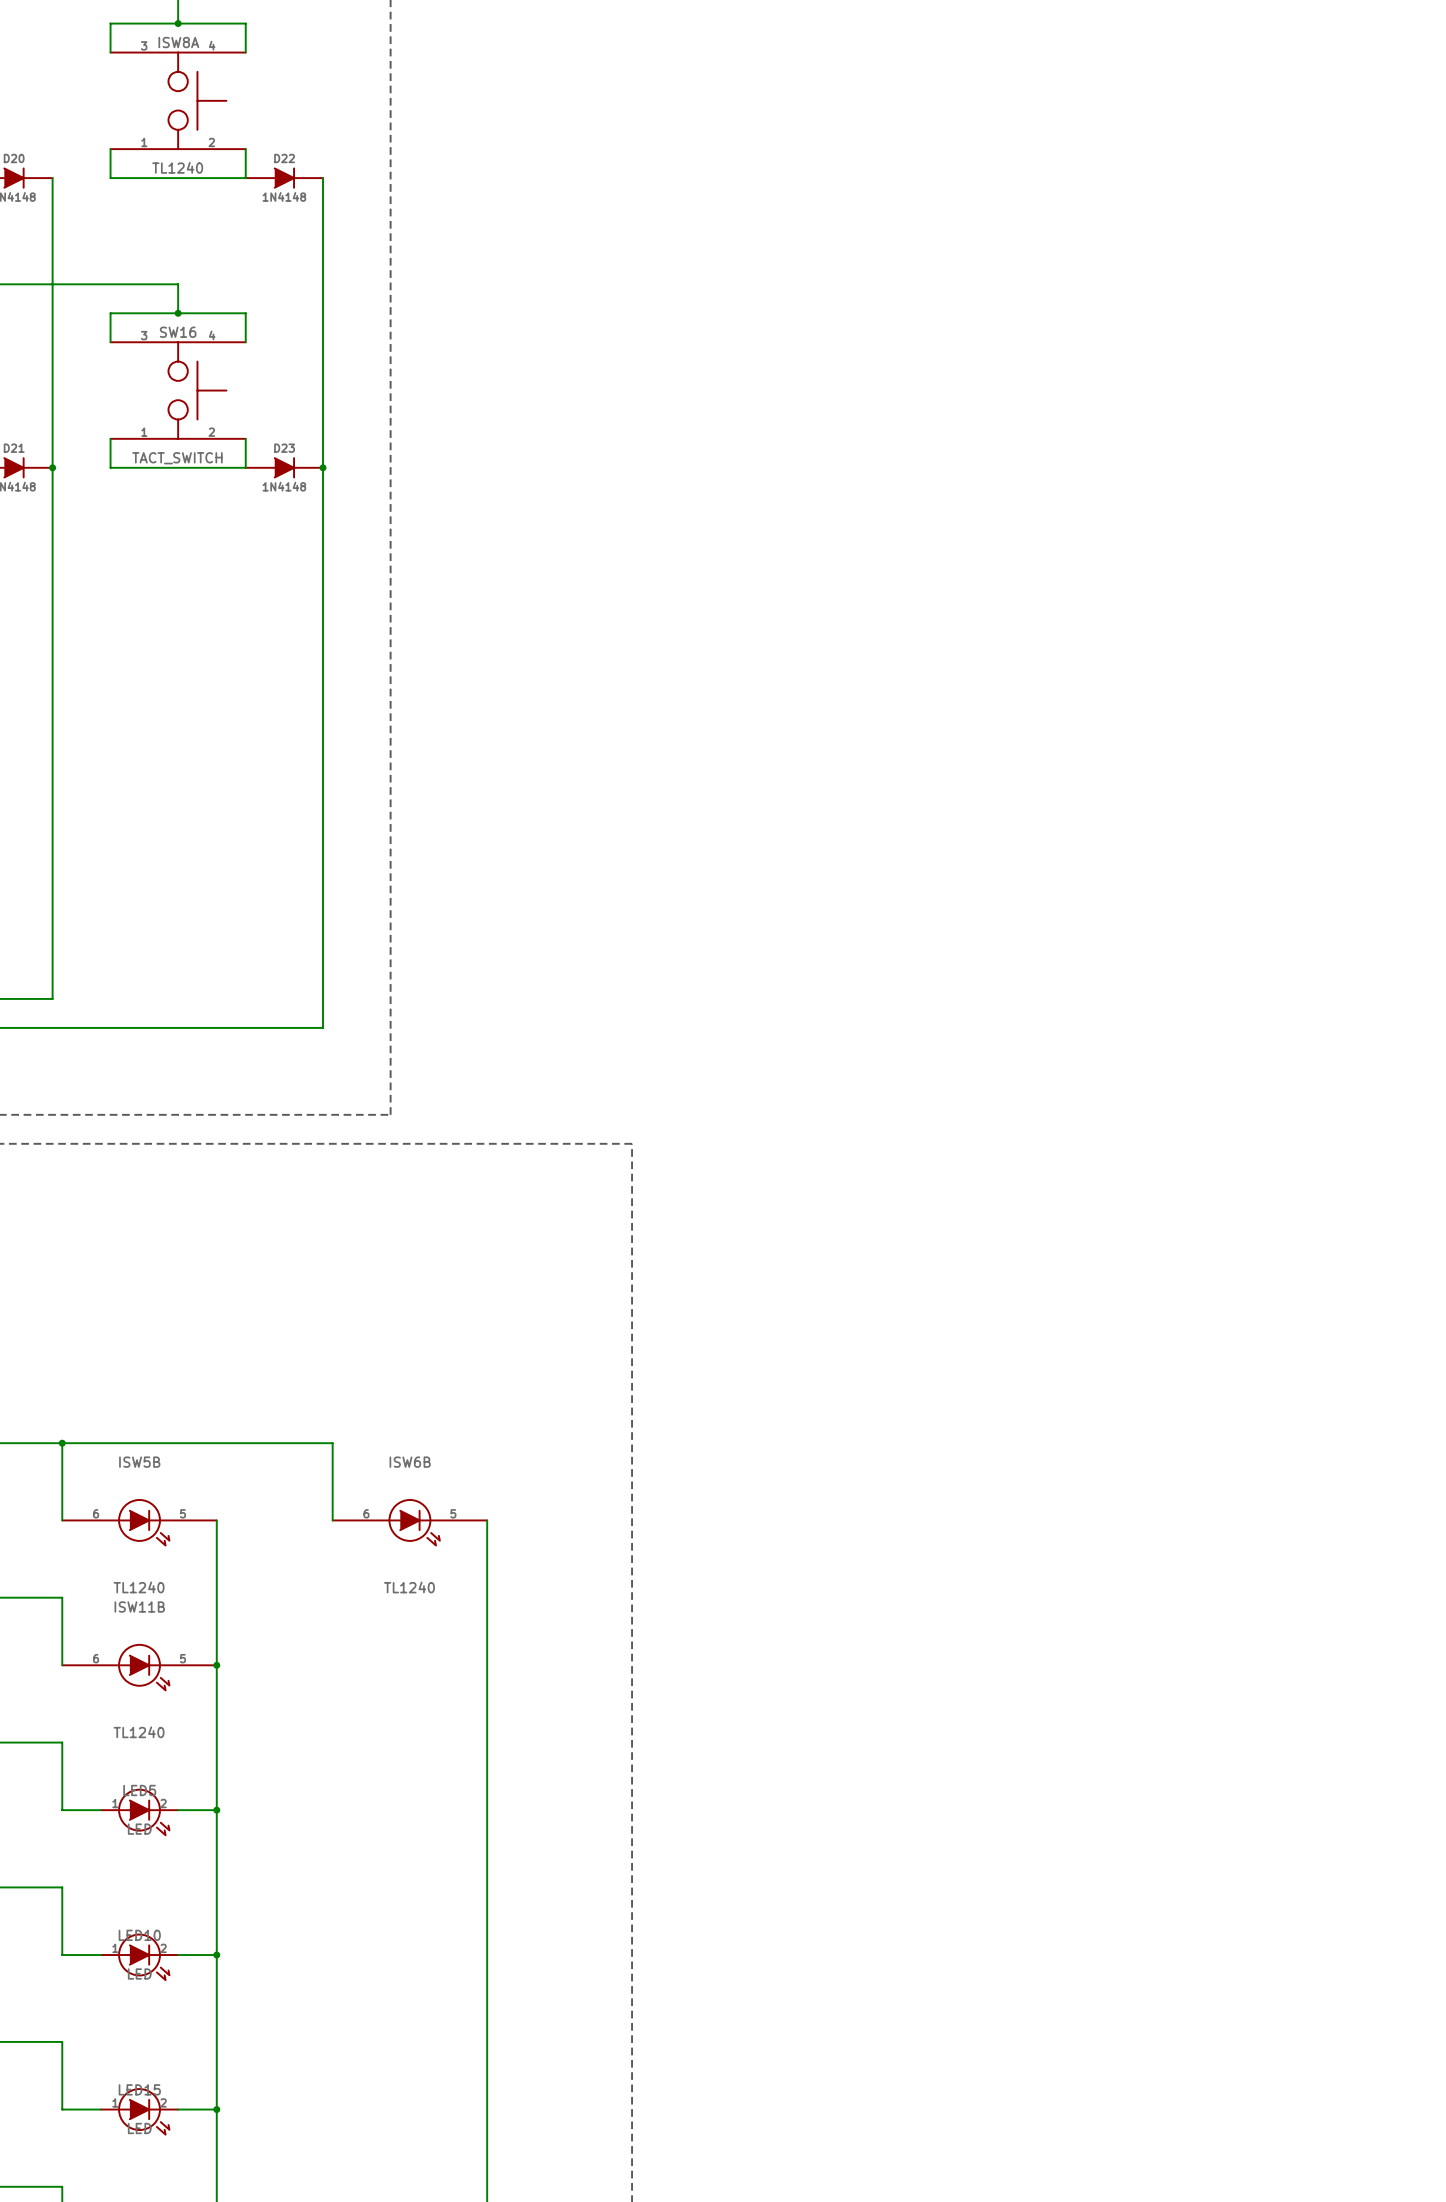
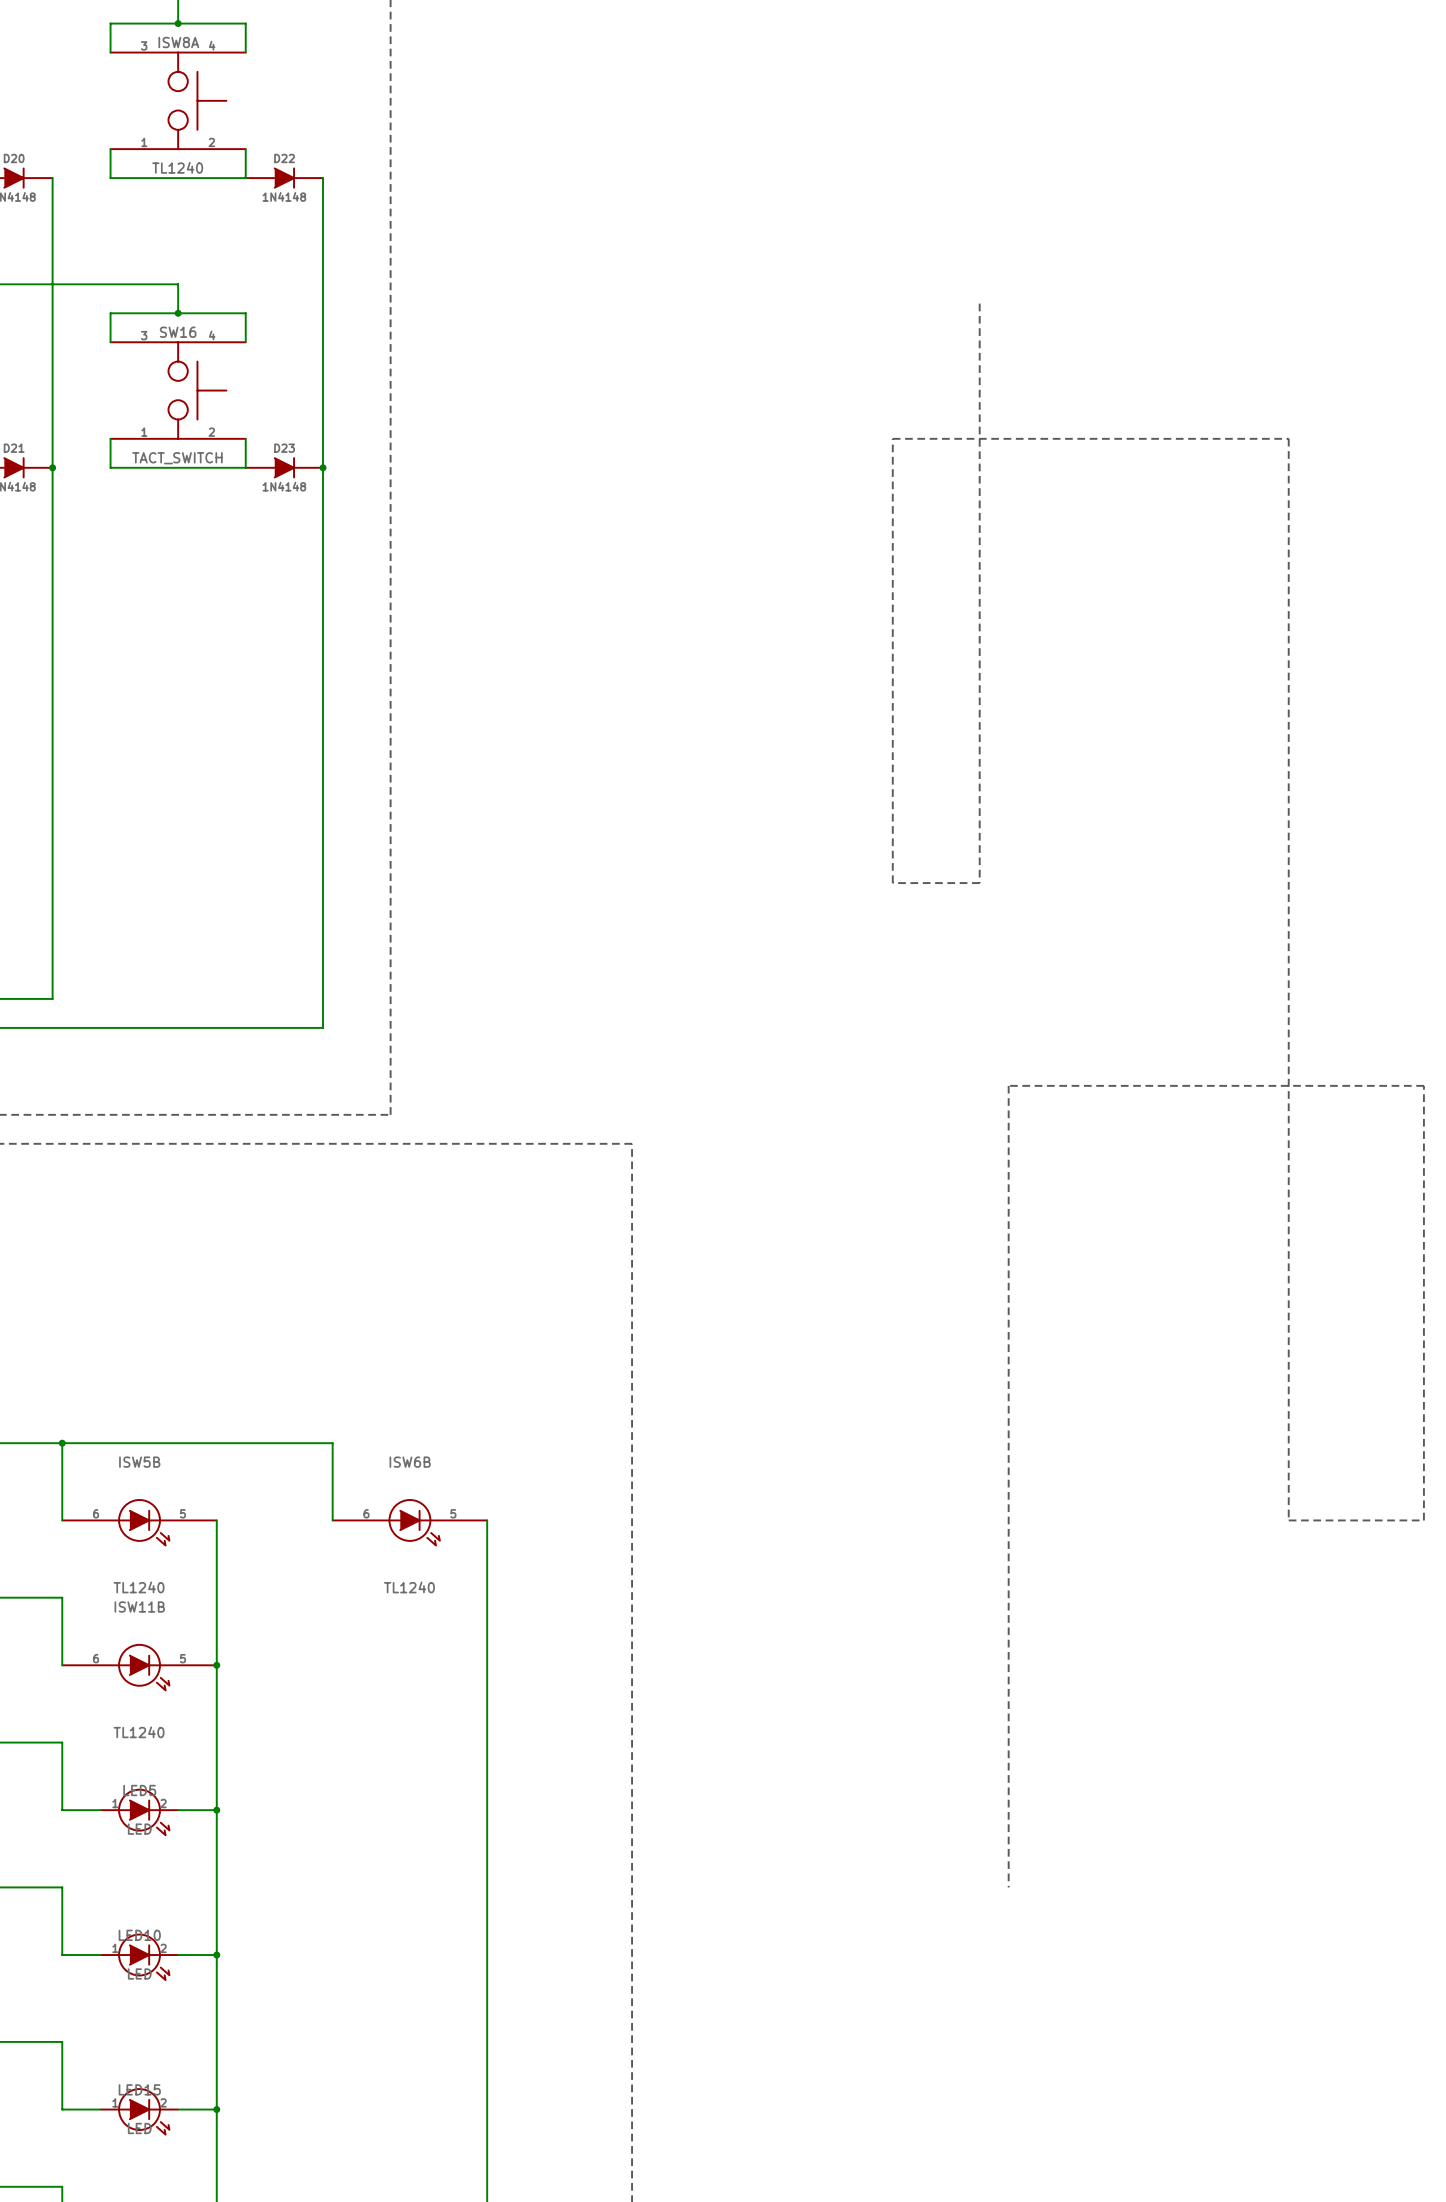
line: none -> (979, 303) (979, 883) (892, 883) (892, 438) (1288, 438) (1288, 1520) (1423, 1520) (1423, 1085) (1008, 1085) (1008, 1887)

